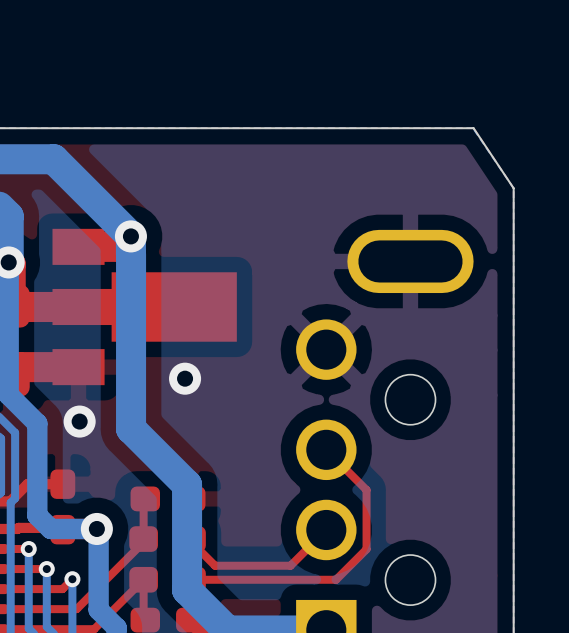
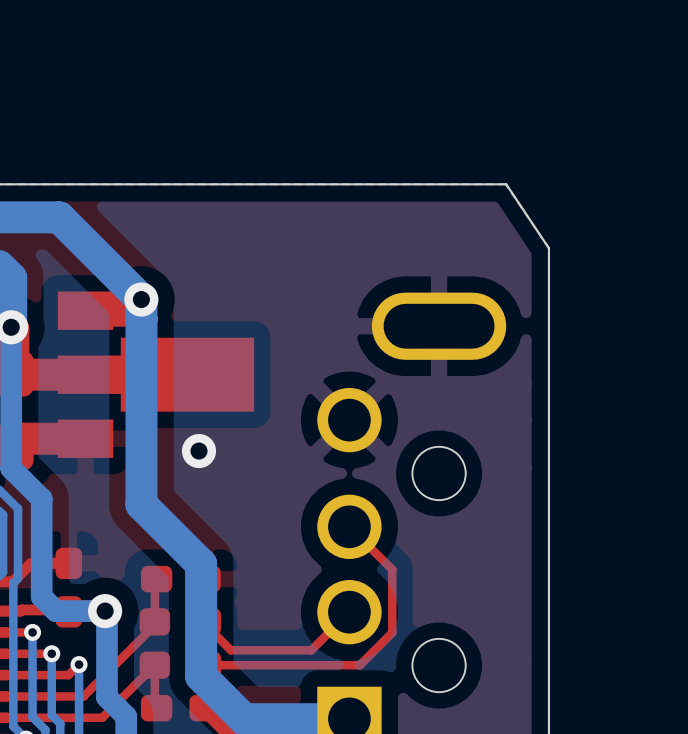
via: (79, 421) -> none

